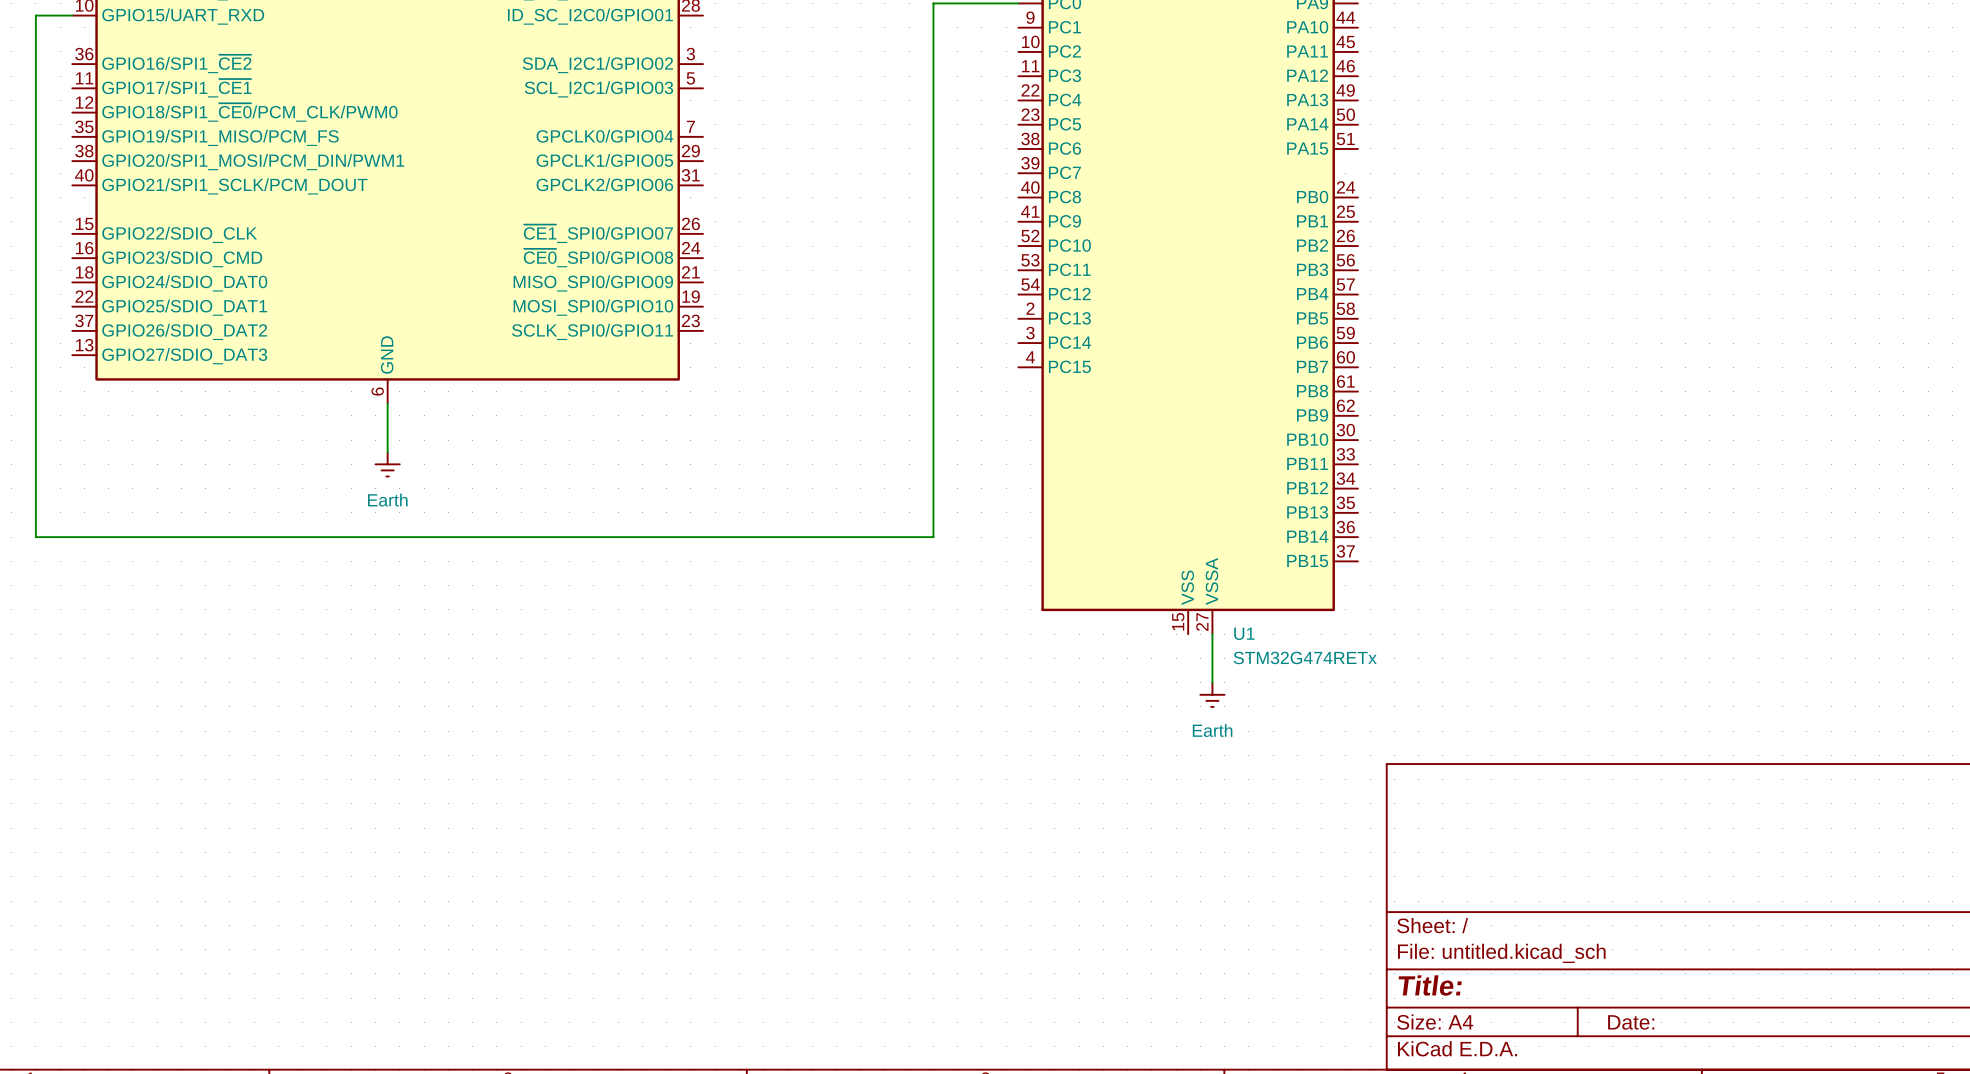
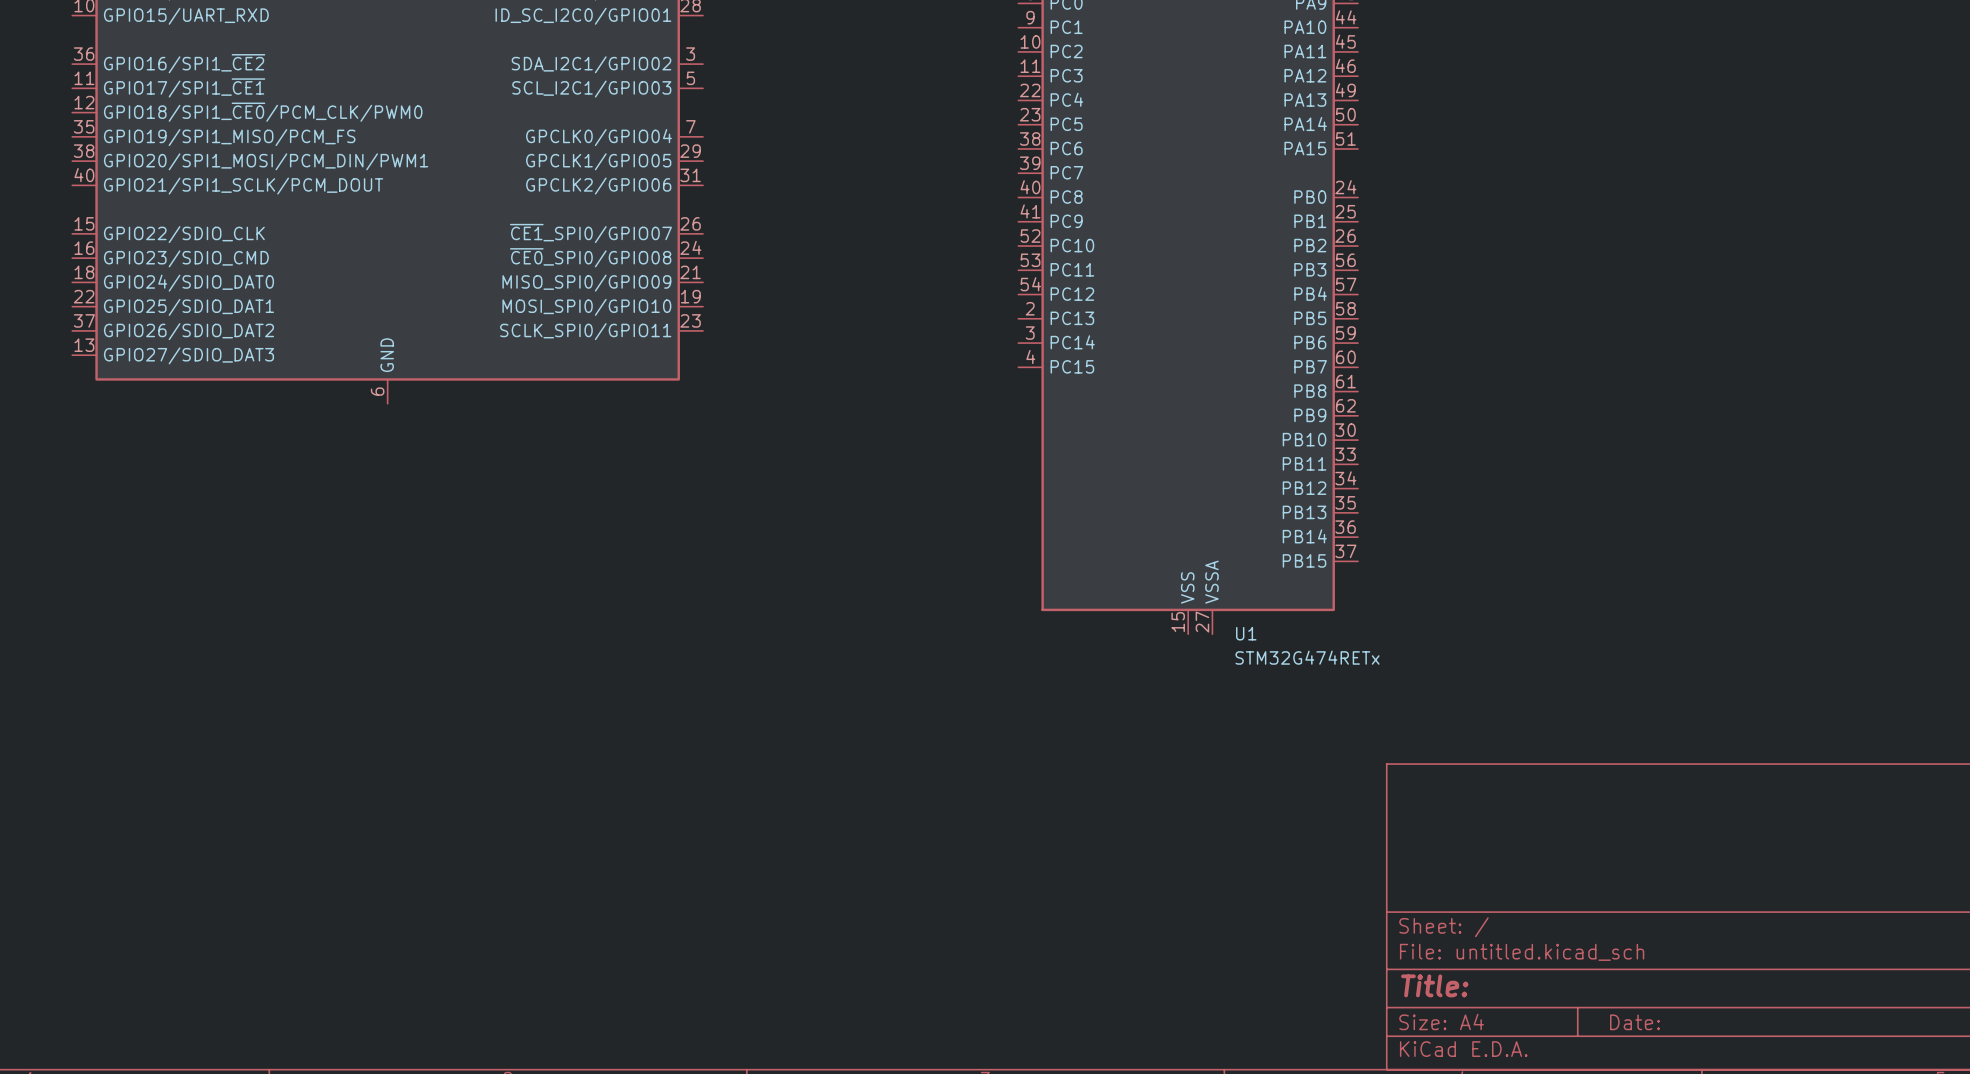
wire: (1018, 3) (933, 3) (933, 537) (35, 537) (35, 15) (72, 15) -> none
wire: (387, 403) (387, 452) -> none
power symbol: Earth (387, 464) -> none
wire: (1212, 634) (1212, 682) -> none
power symbol: Earth (1212, 694) -> none

